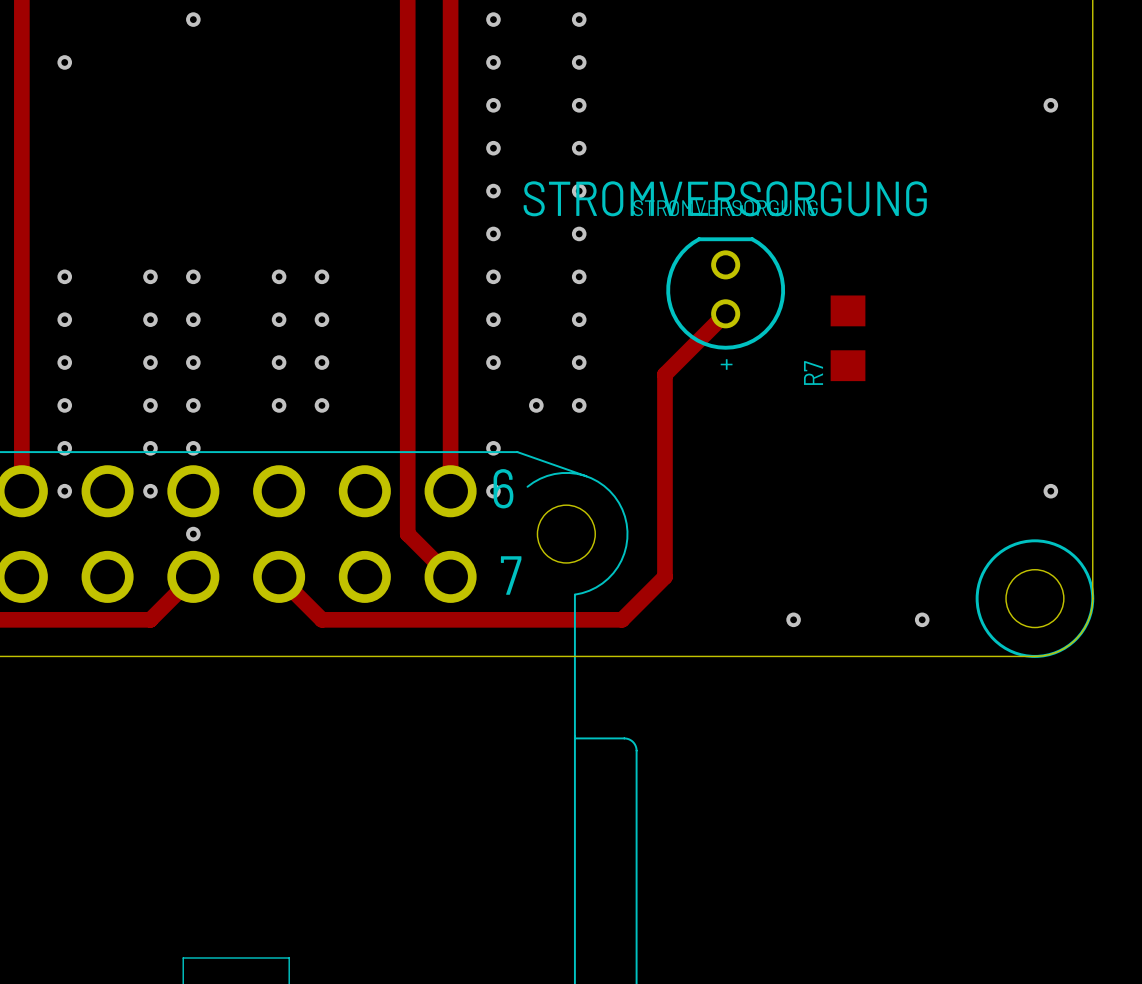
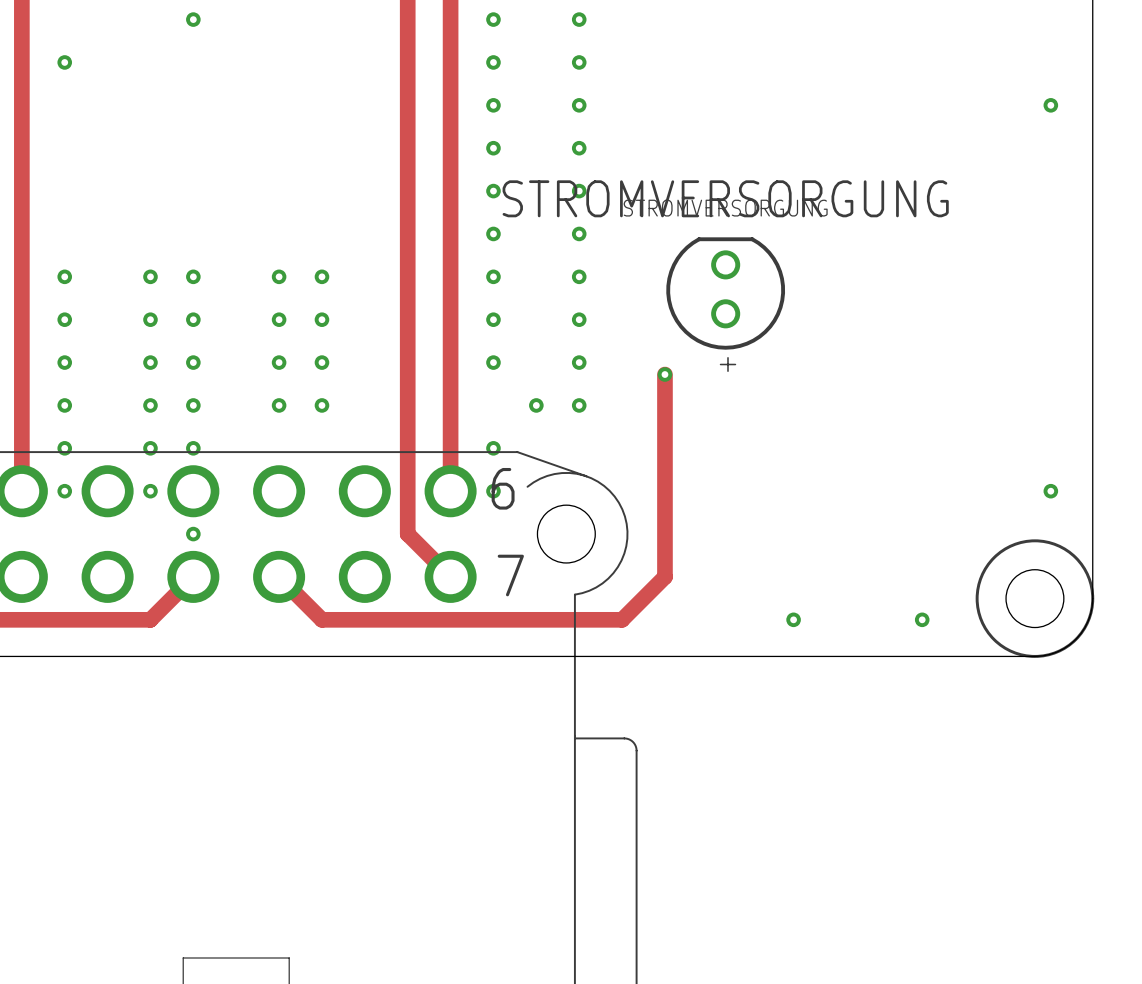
track: (725, 313) (664, 374) -> none
R7: (848, 338) -> none
via: none -> (664, 374)

